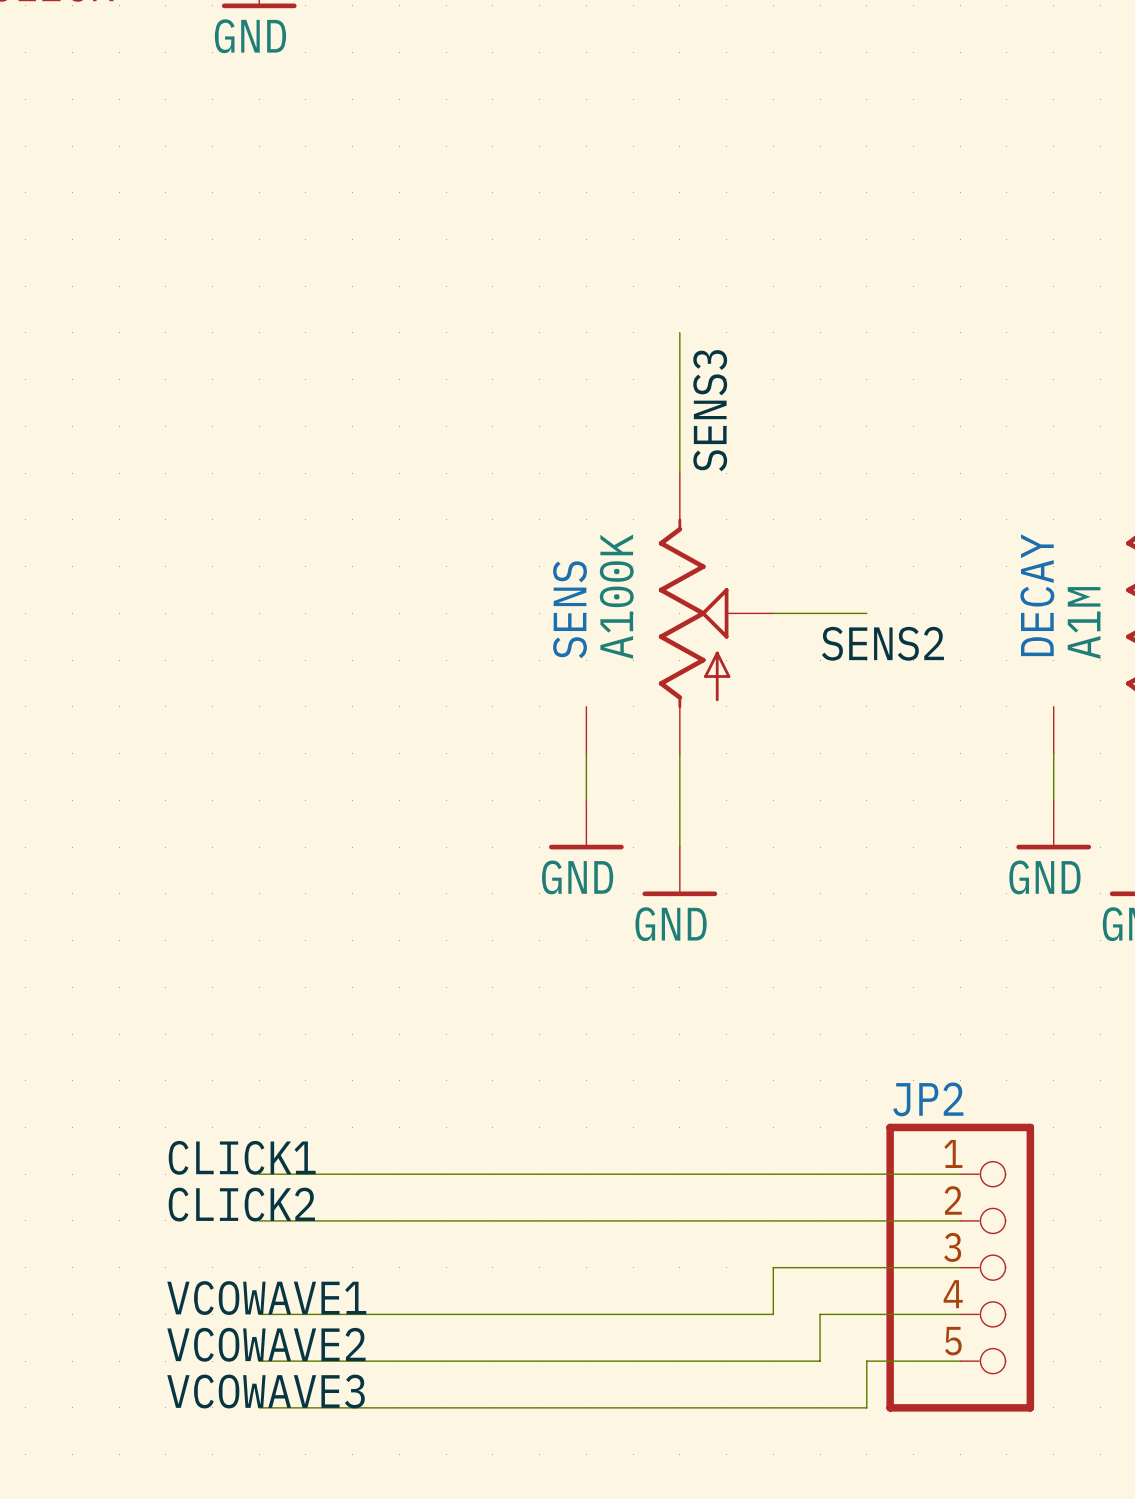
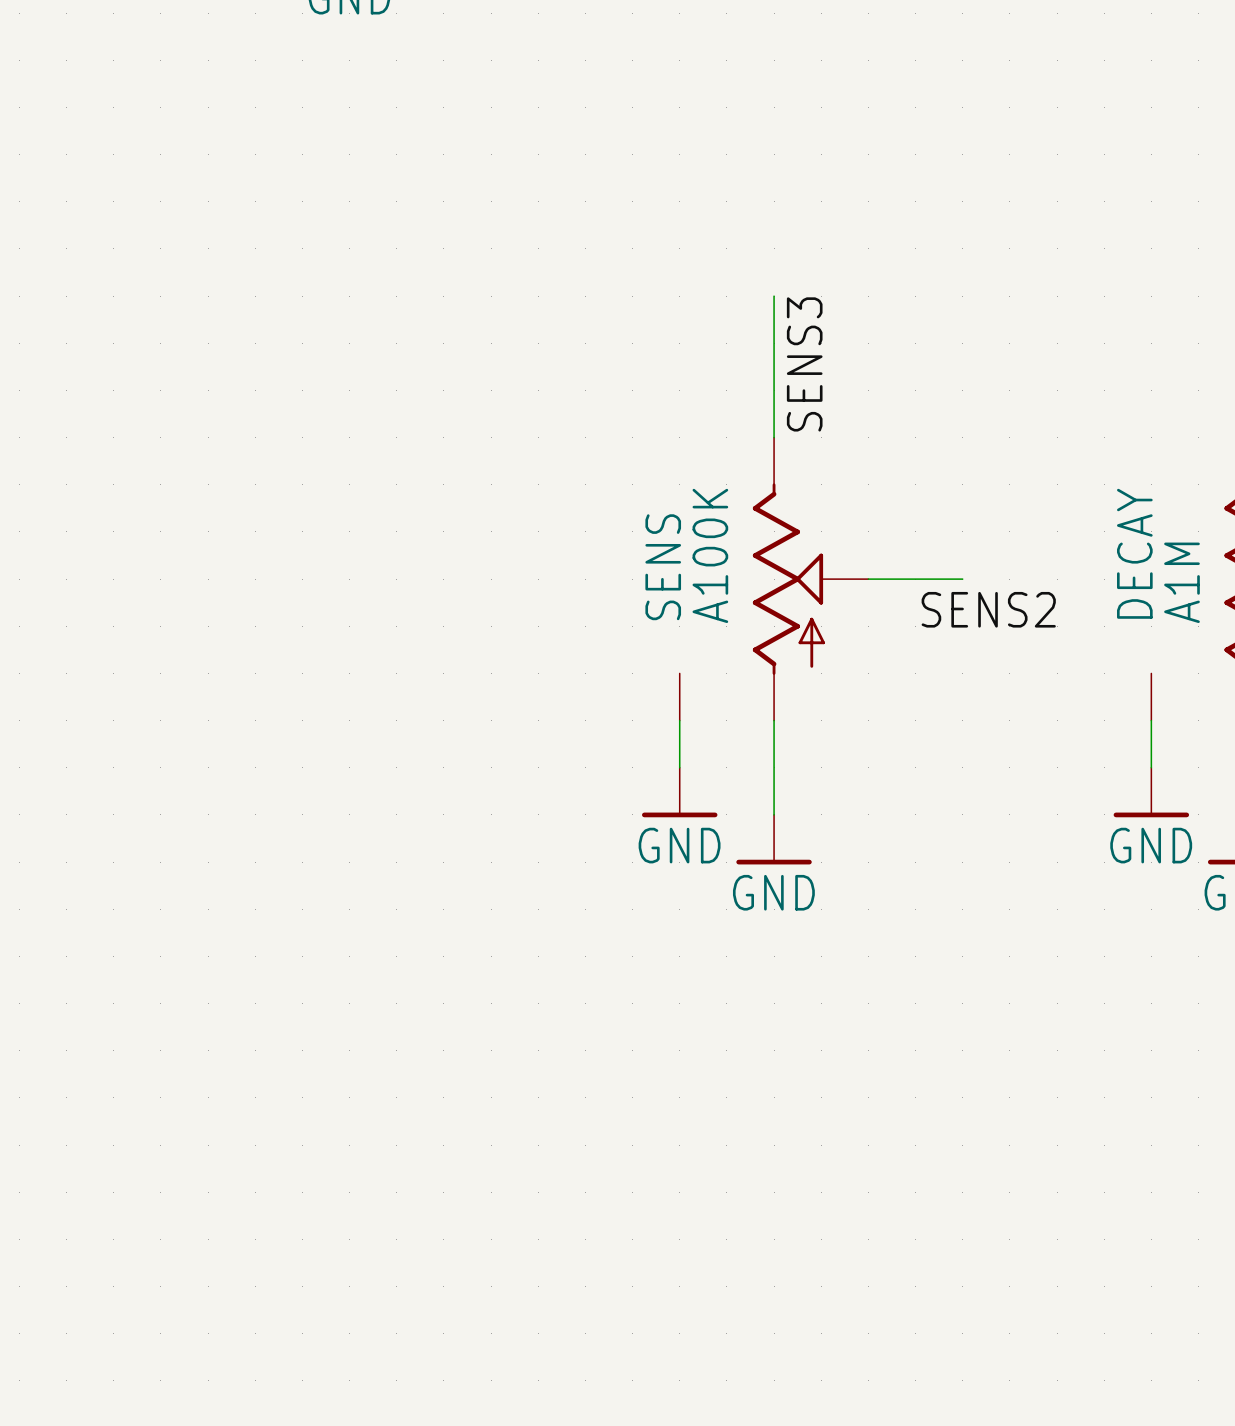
label: CLICK1 (242, 1157) -> none
wire: (259, 1174) (960, 1174) -> none
label: CLICK2 (241, 1204) -> none
wire: (259, 1220) (960, 1220) -> none
wire: (960, 1267) (773, 1267) (773, 1314) (259, 1314) -> none
JP2: (960, 1267) -> none
label: VCOWAVE1 (266, 1298) -> none
wire: (960, 1314) (820, 1314) (820, 1361) (259, 1361) -> none
label: VCOWAVE2 (266, 1344) -> none
wire: (960, 1361) (866, 1361) (866, 1407) (259, 1407) -> none
label: VCOWAVE3 (266, 1391) -> none

